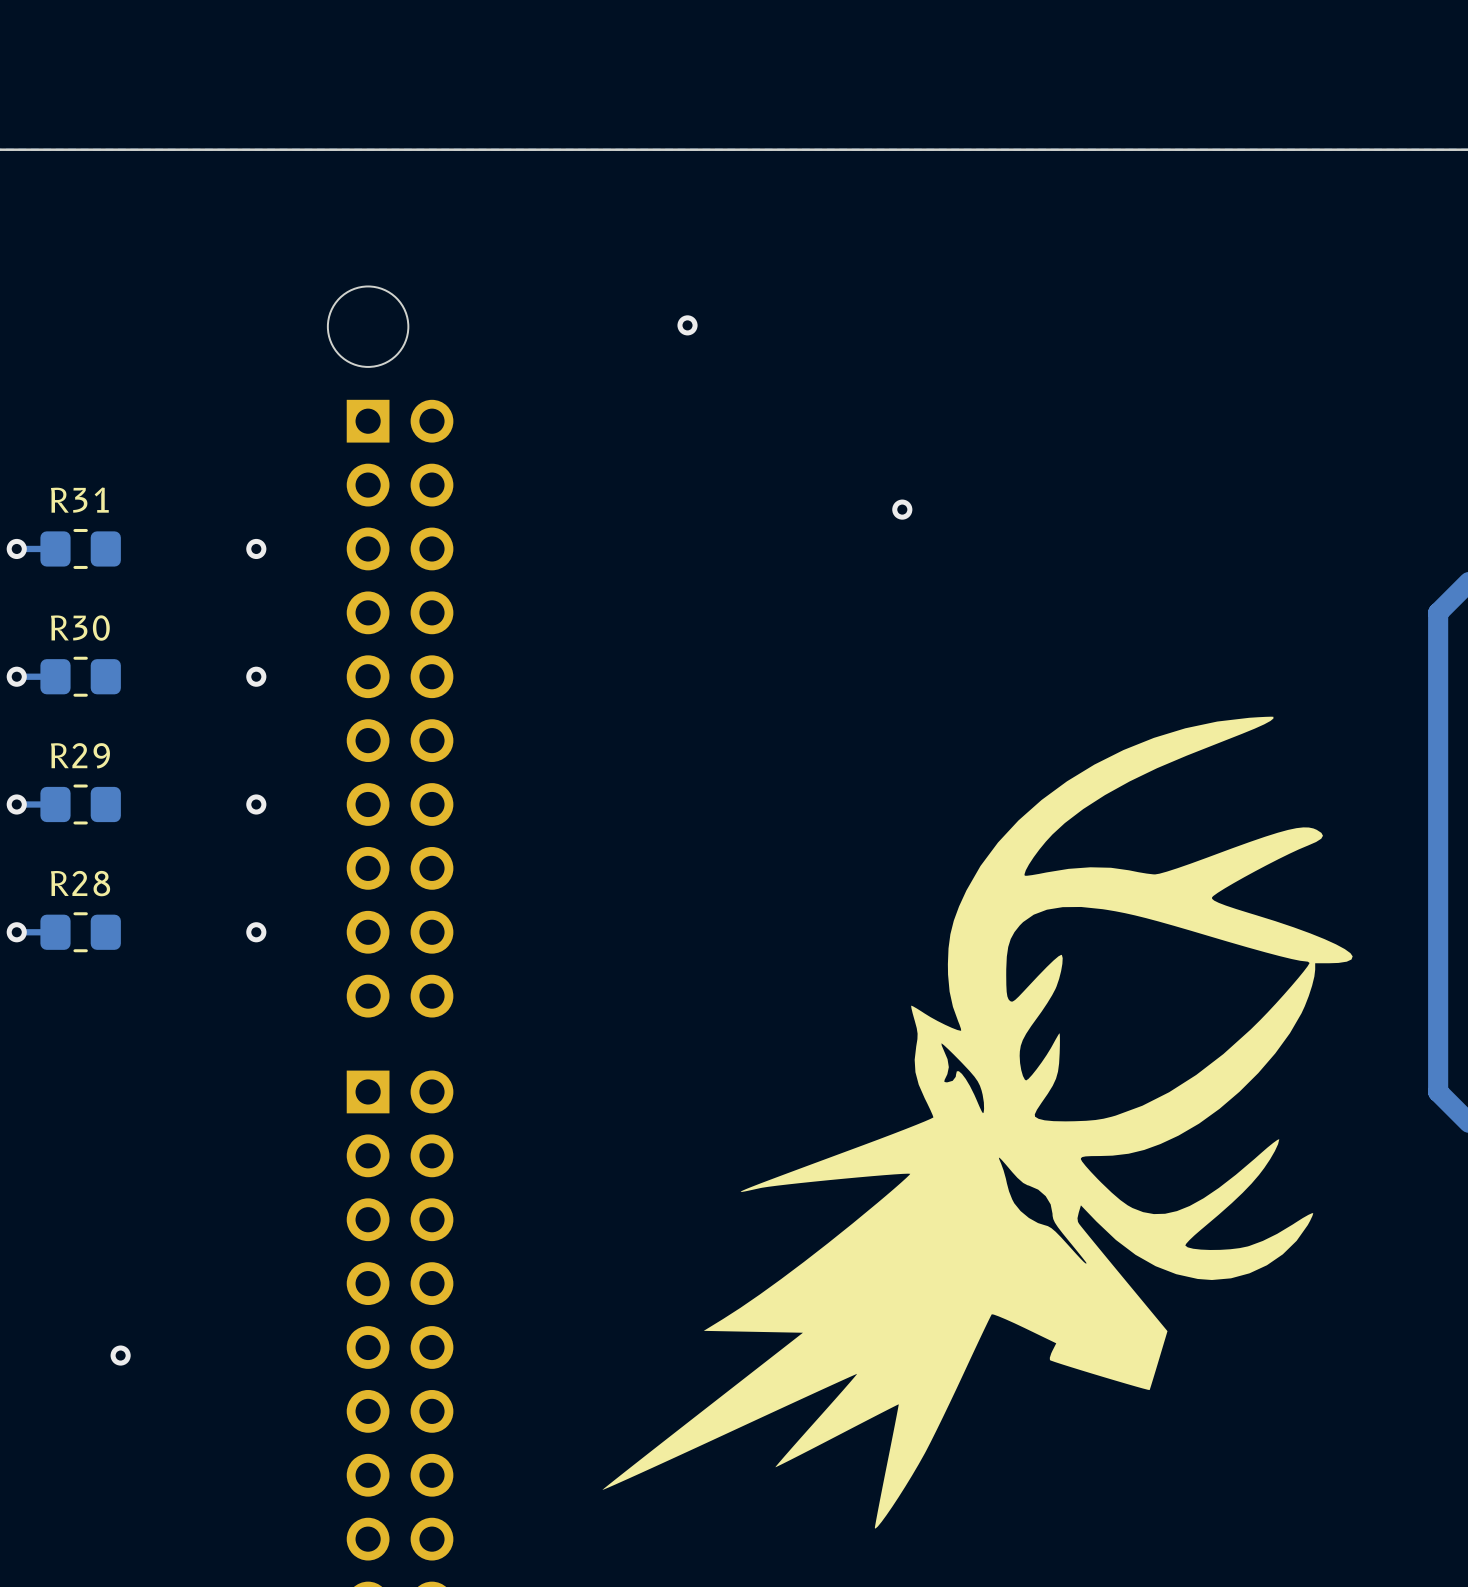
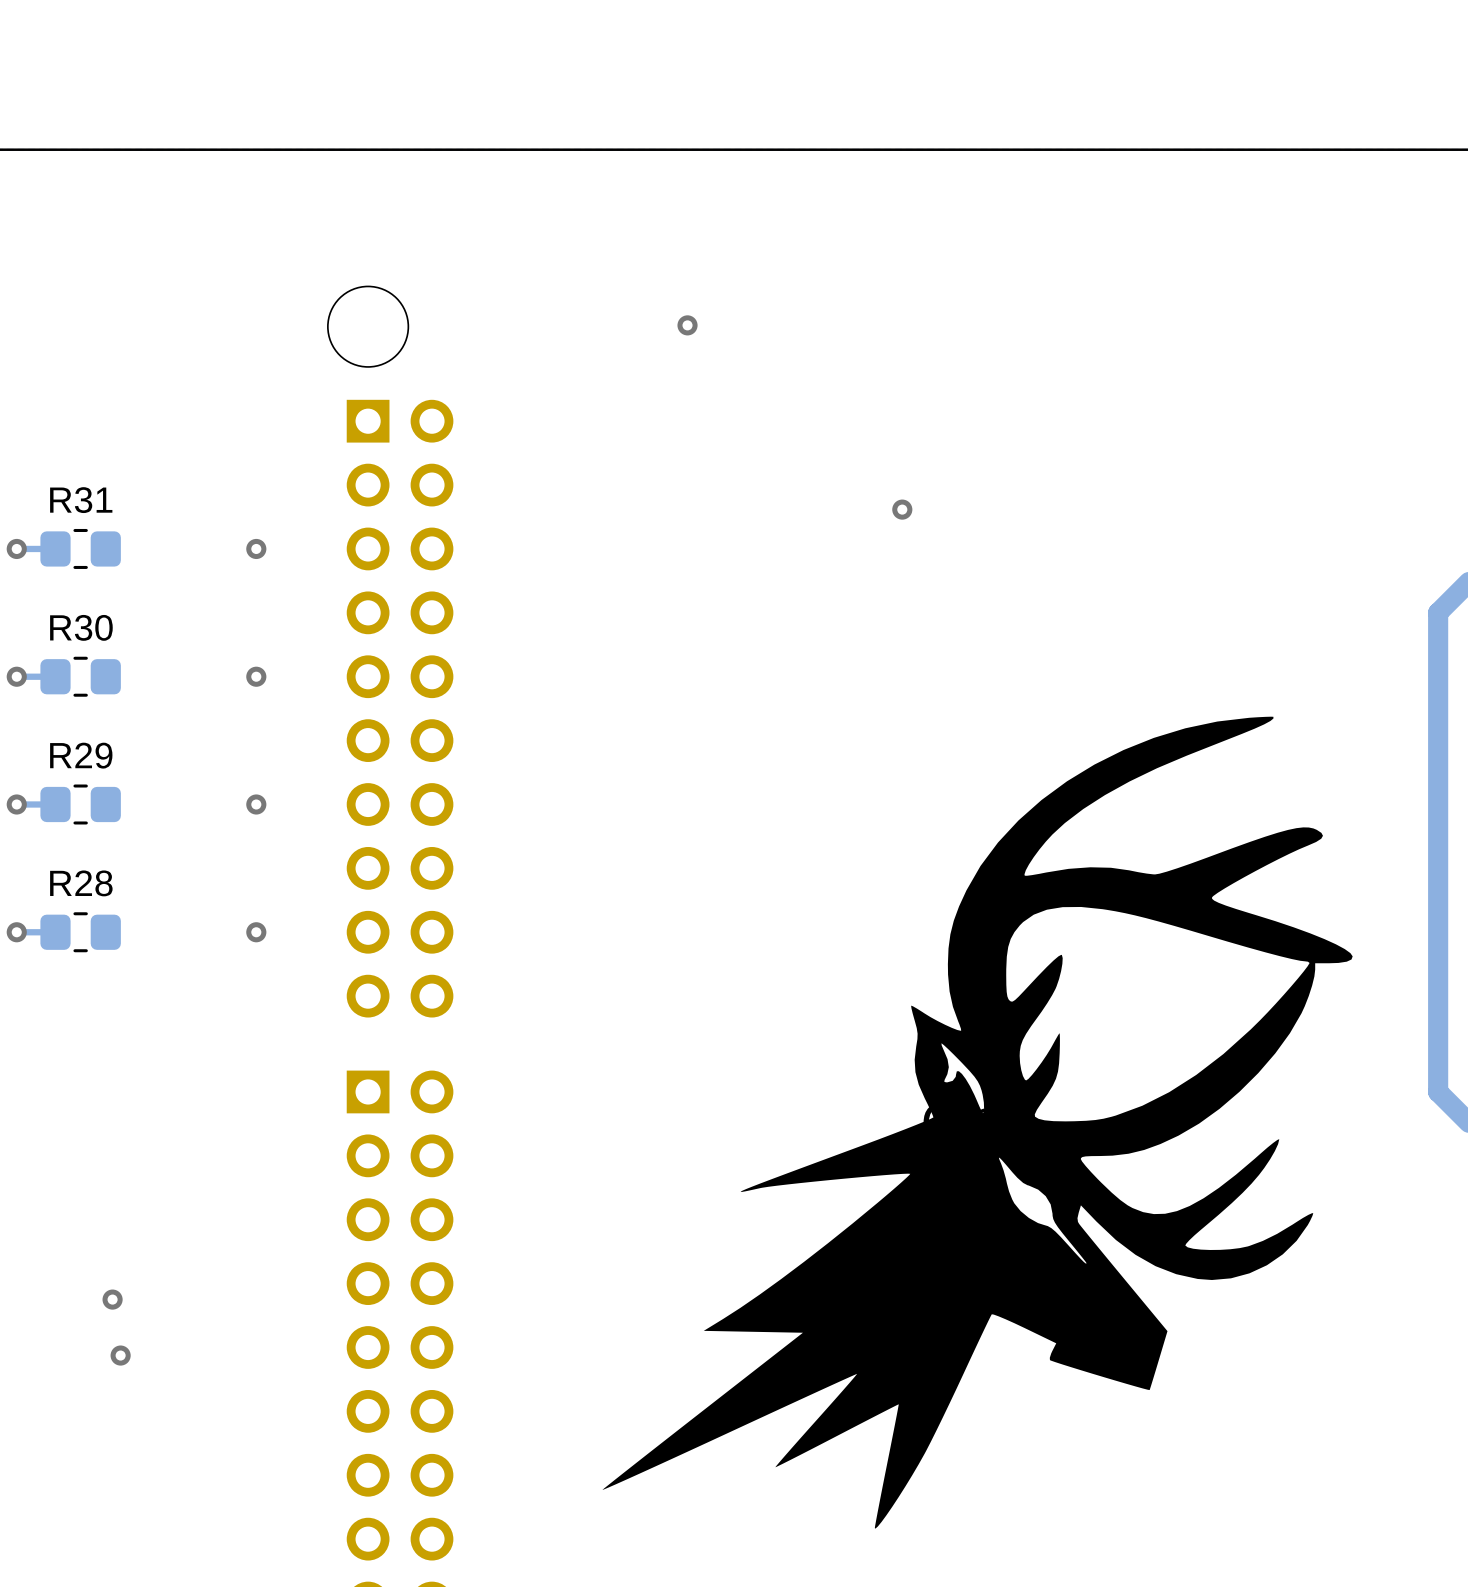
drawing: [602, 716, 1353, 1529] -> none
part: none -> (977, 1122)
via: none -> (112, 1299)

